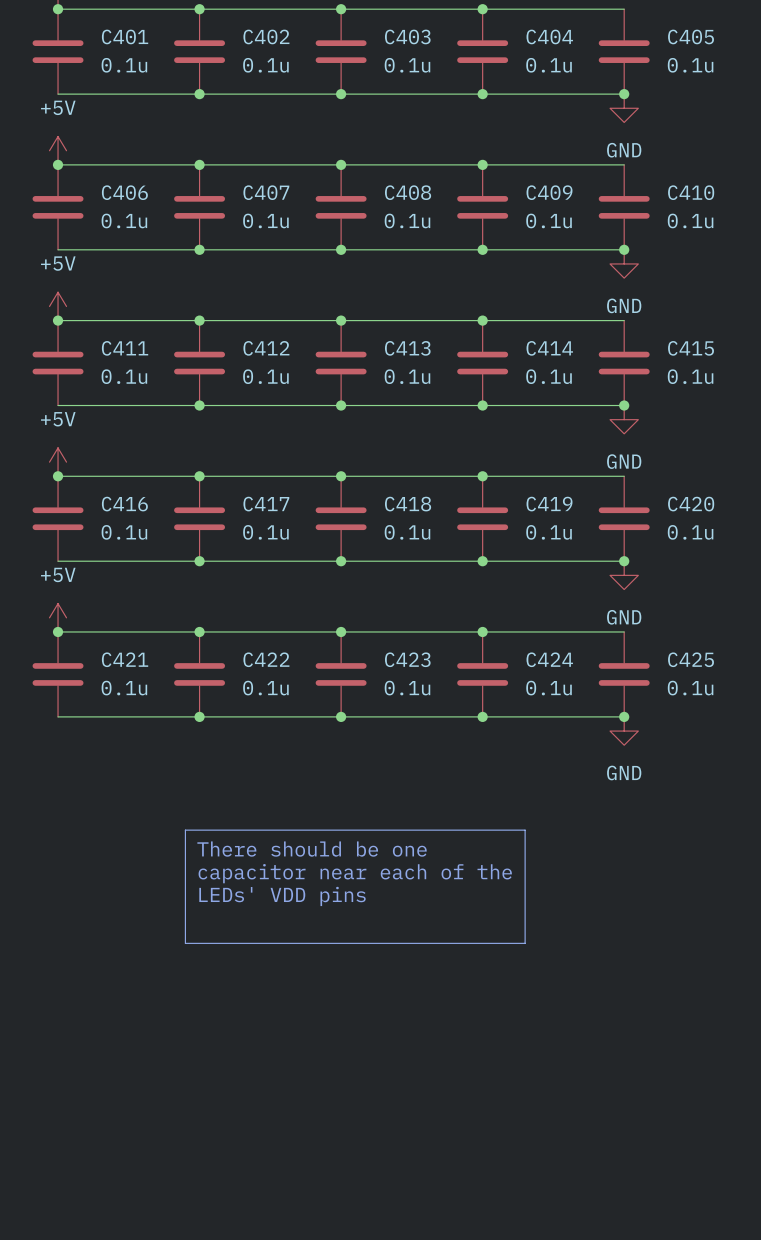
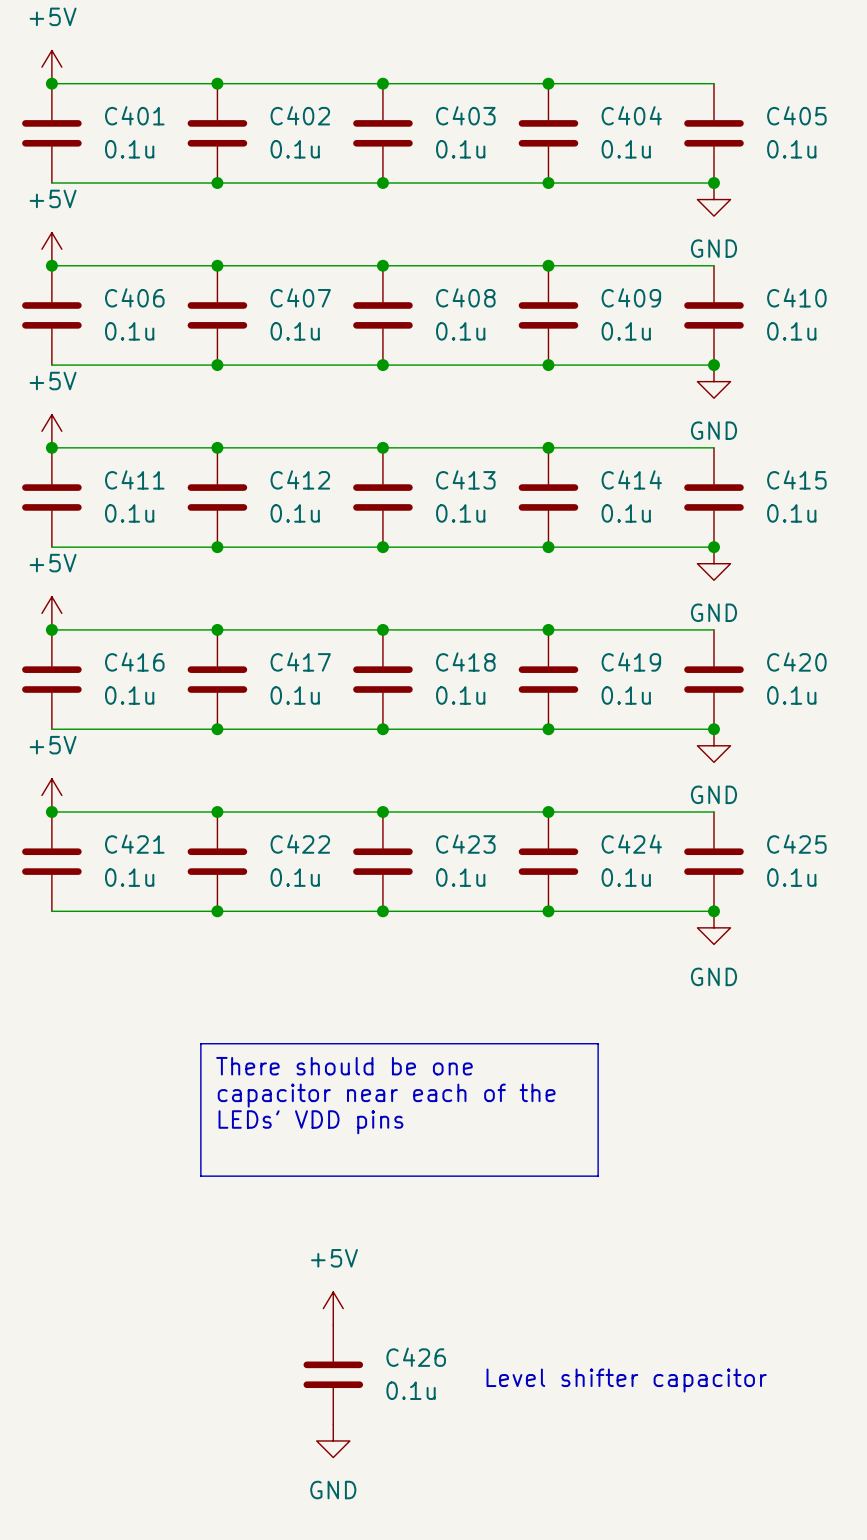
power symbol: none -> +5V (333, 1308)
C426: none -> 0.1u (333, 1374)
text: none -> Level shifter capacitor (626, 1380)
power symbol: none -> GND (333, 1440)

